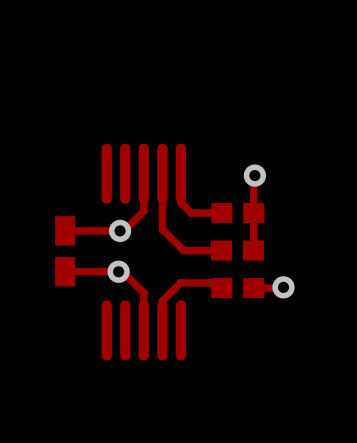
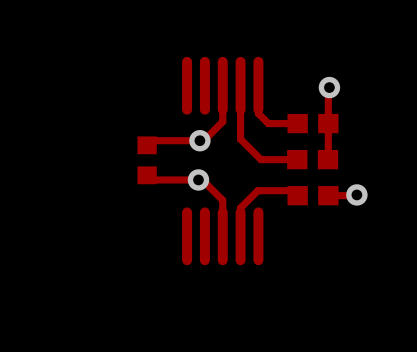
part footprint: [55, 216, 76, 287] -> [137, 136, 157, 185]

